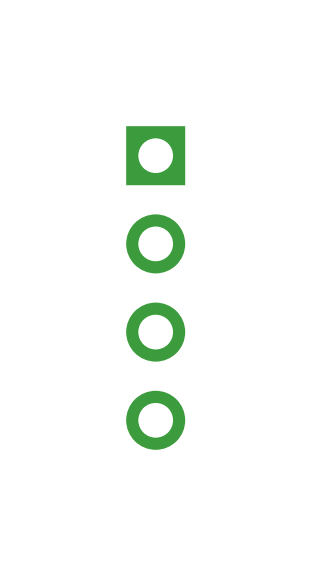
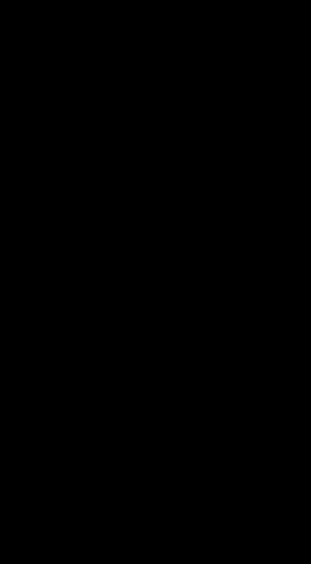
part: (155, 287) -> none

